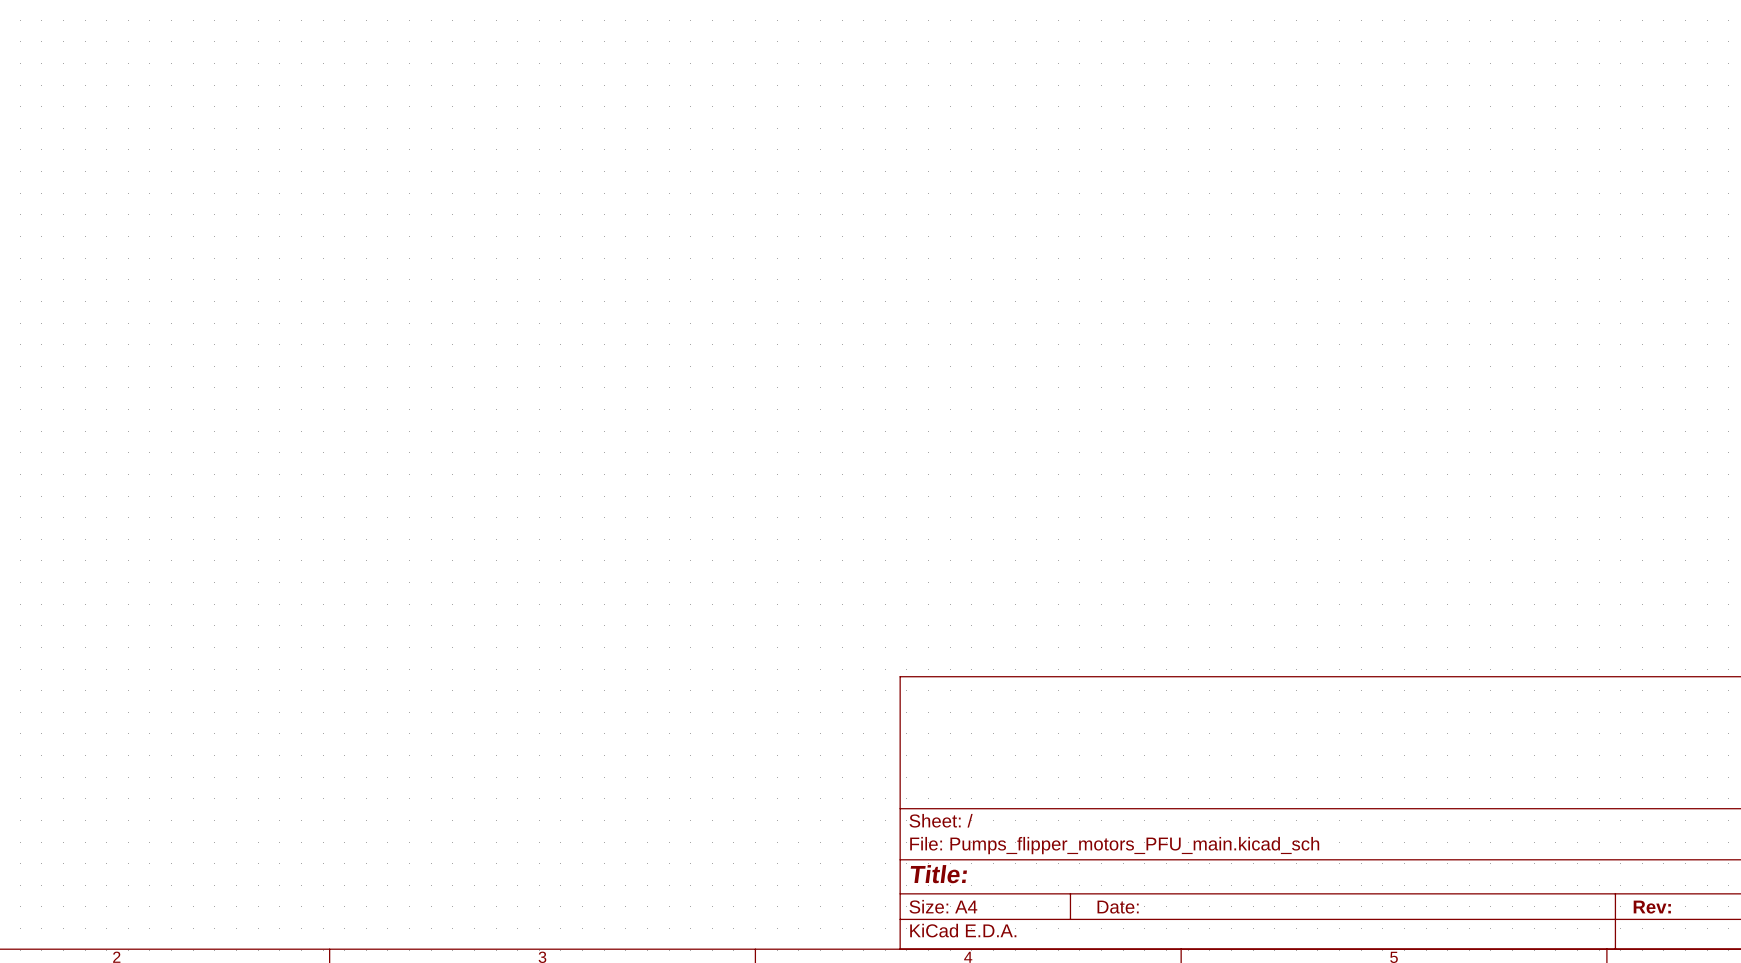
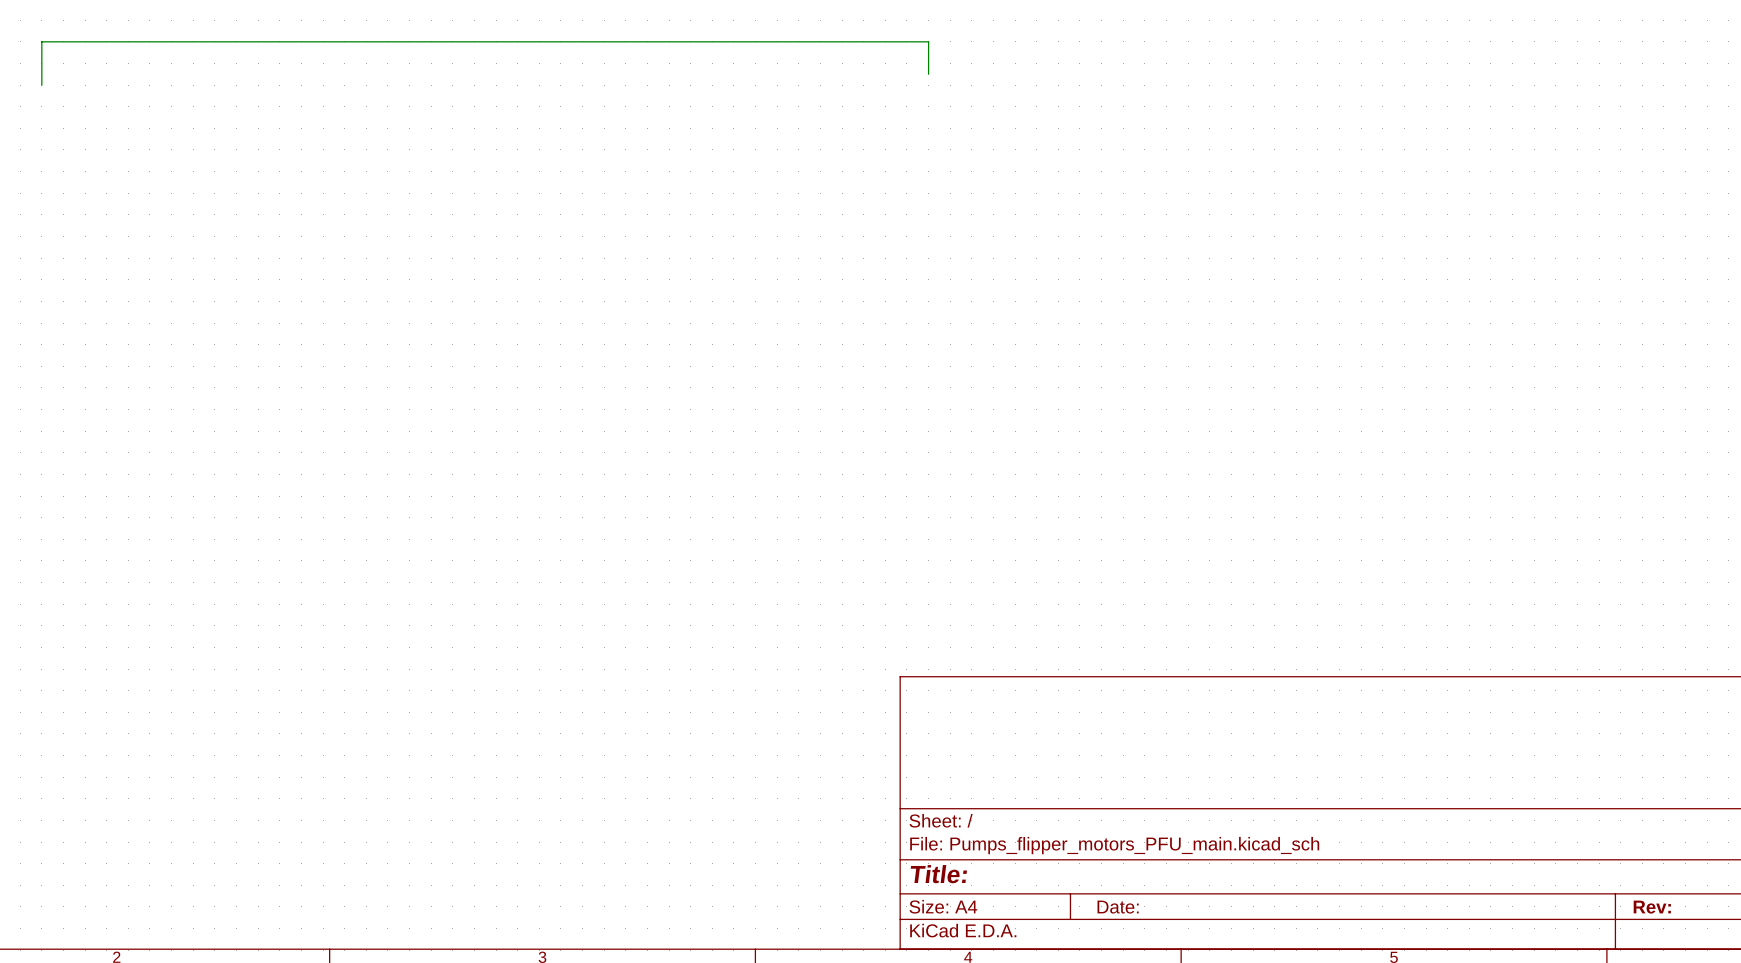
wire: none -> (928, 74) (928, 41) (41, 41) (41, 85)

